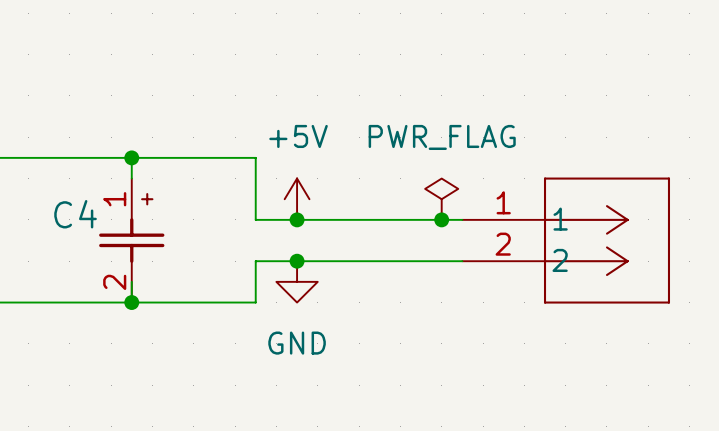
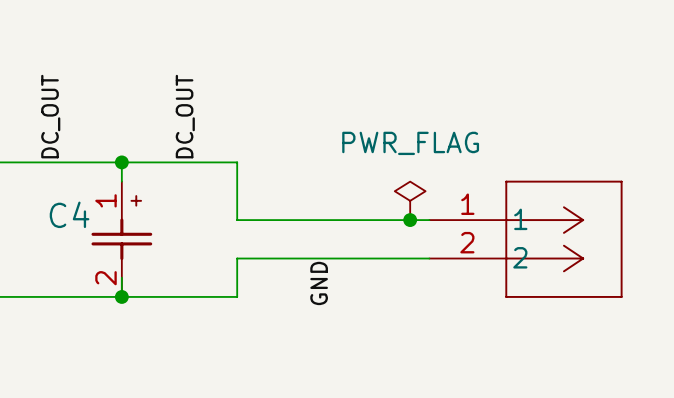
label: none -> DC_OUT (50, 116)
label: none -> DC_OUT (185, 116)
power symbol: +5V (297, 199) -> none
junction: (297, 219) -> none
junction: (297, 261) -> none
power symbol: GND (297, 281) -> none
label: none -> GND (319, 283)

